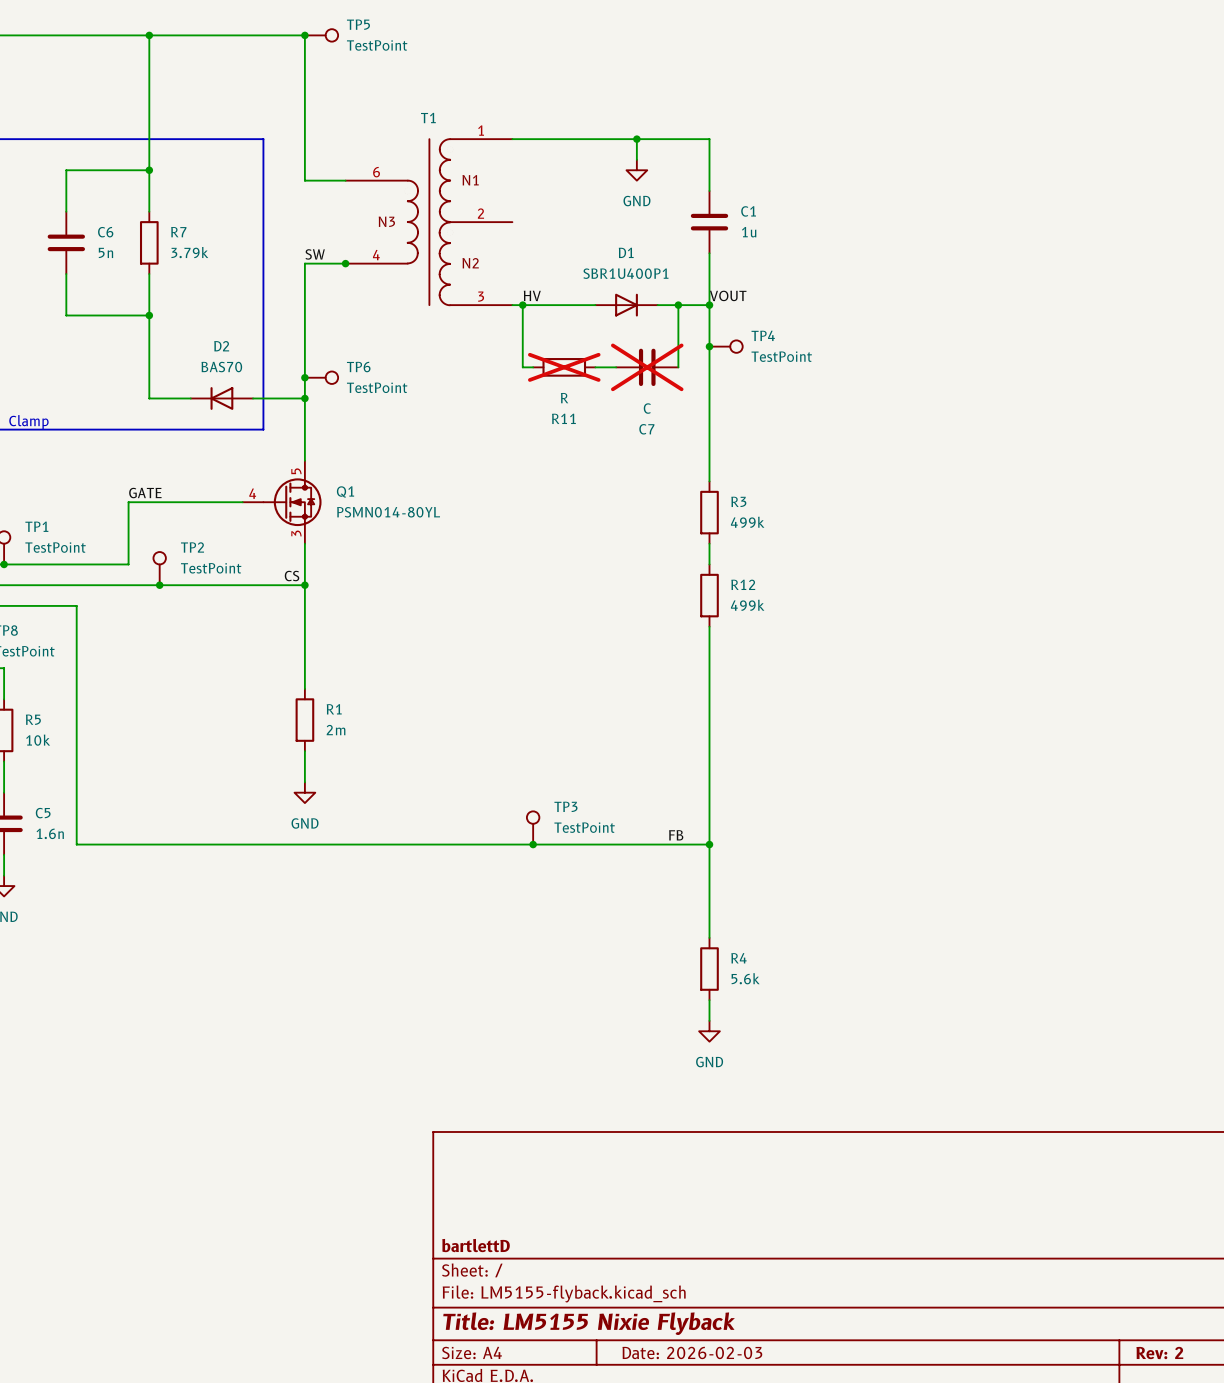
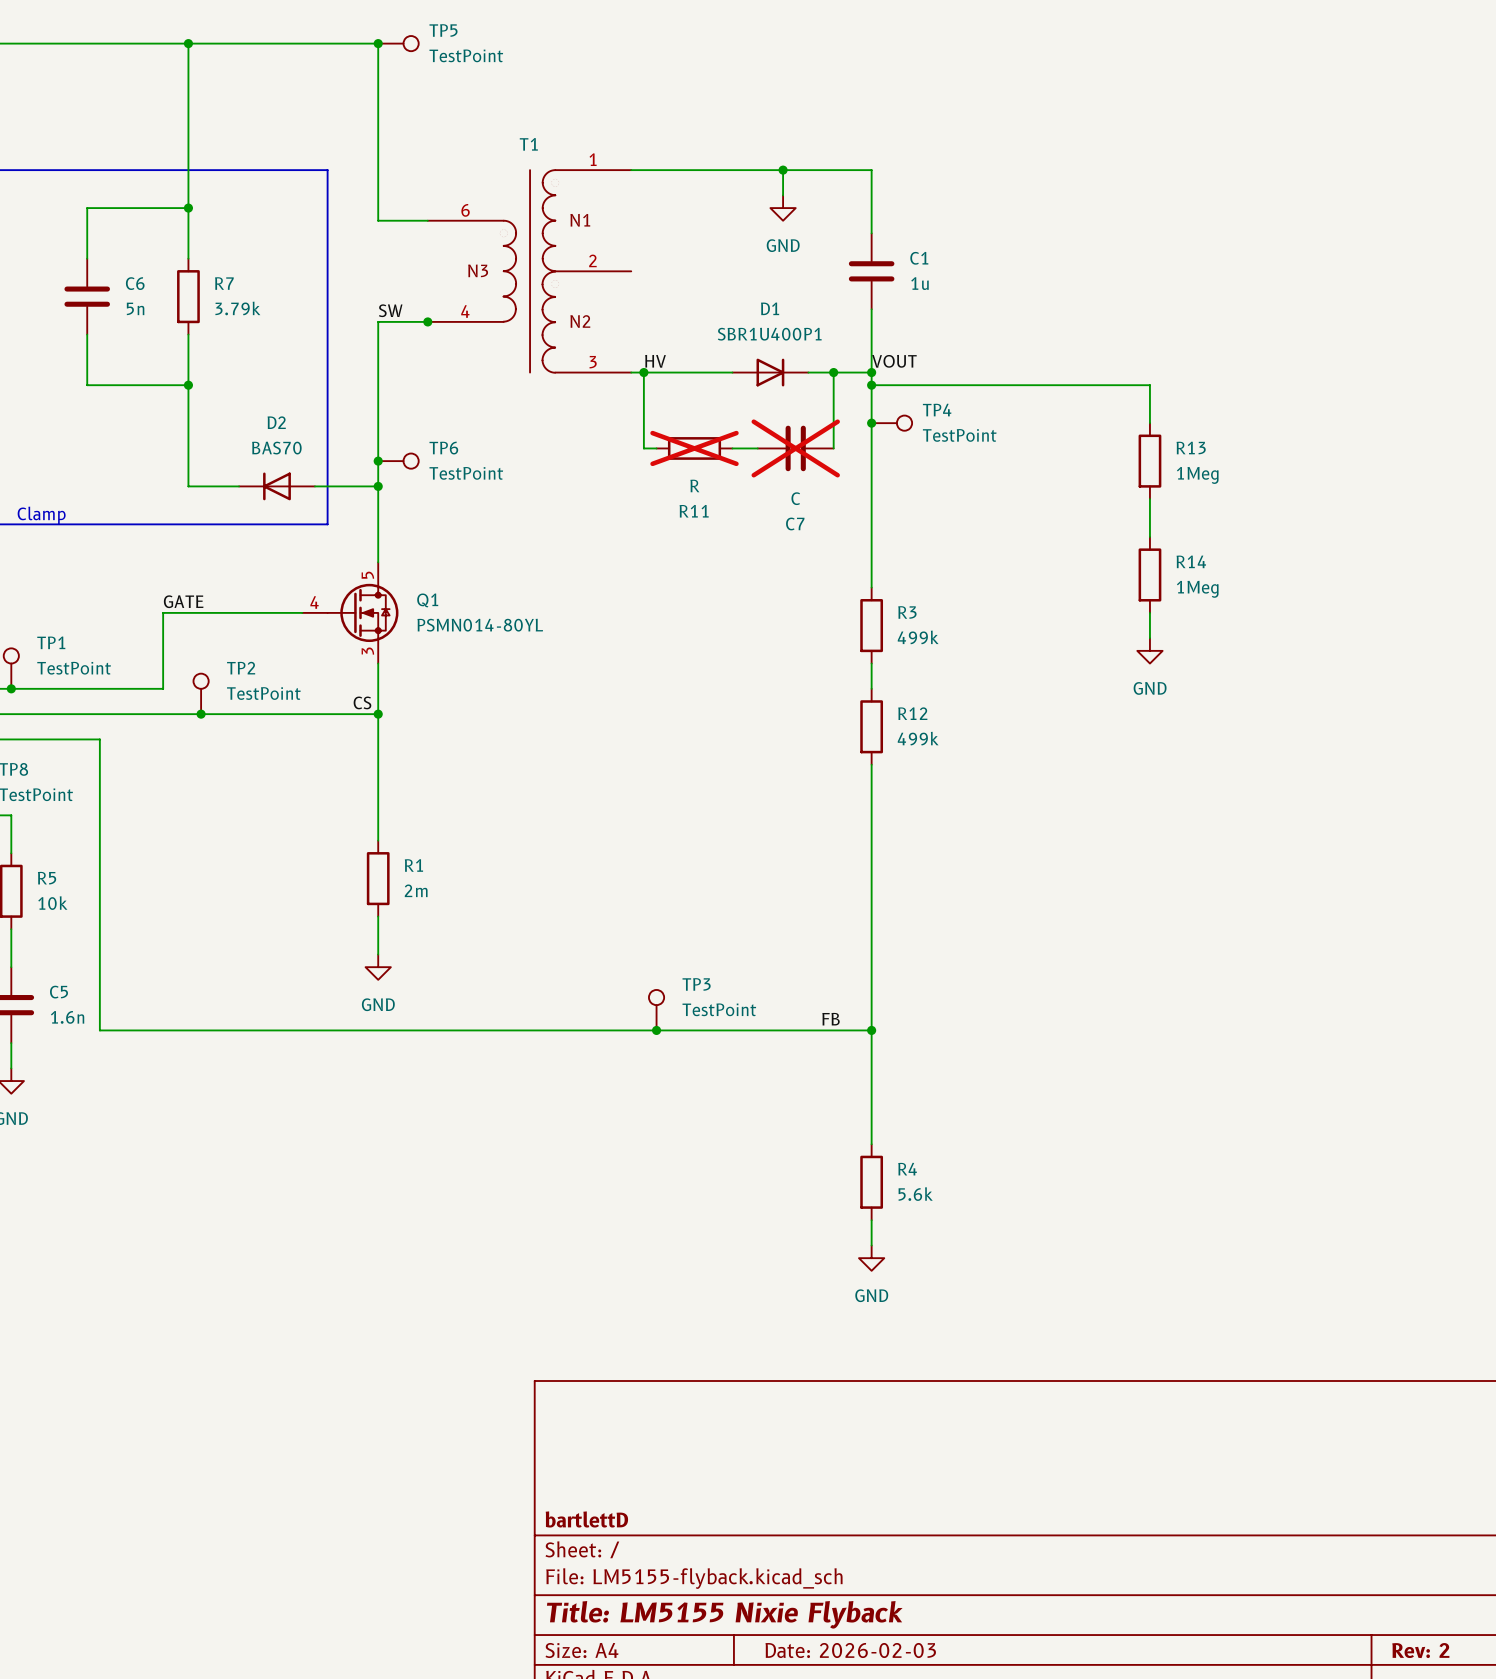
wire: none -> (871, 385) (1149, 385) (1149, 423)
junction: none -> (871, 385)
R13: none -> 1Meg (1149, 461)
wire: none -> (1149, 499) (1149, 537)
R14: none -> 1Meg (1149, 574)
wire: none -> (1149, 612) (1149, 638)
power symbol: none -> GND (1149, 650)

